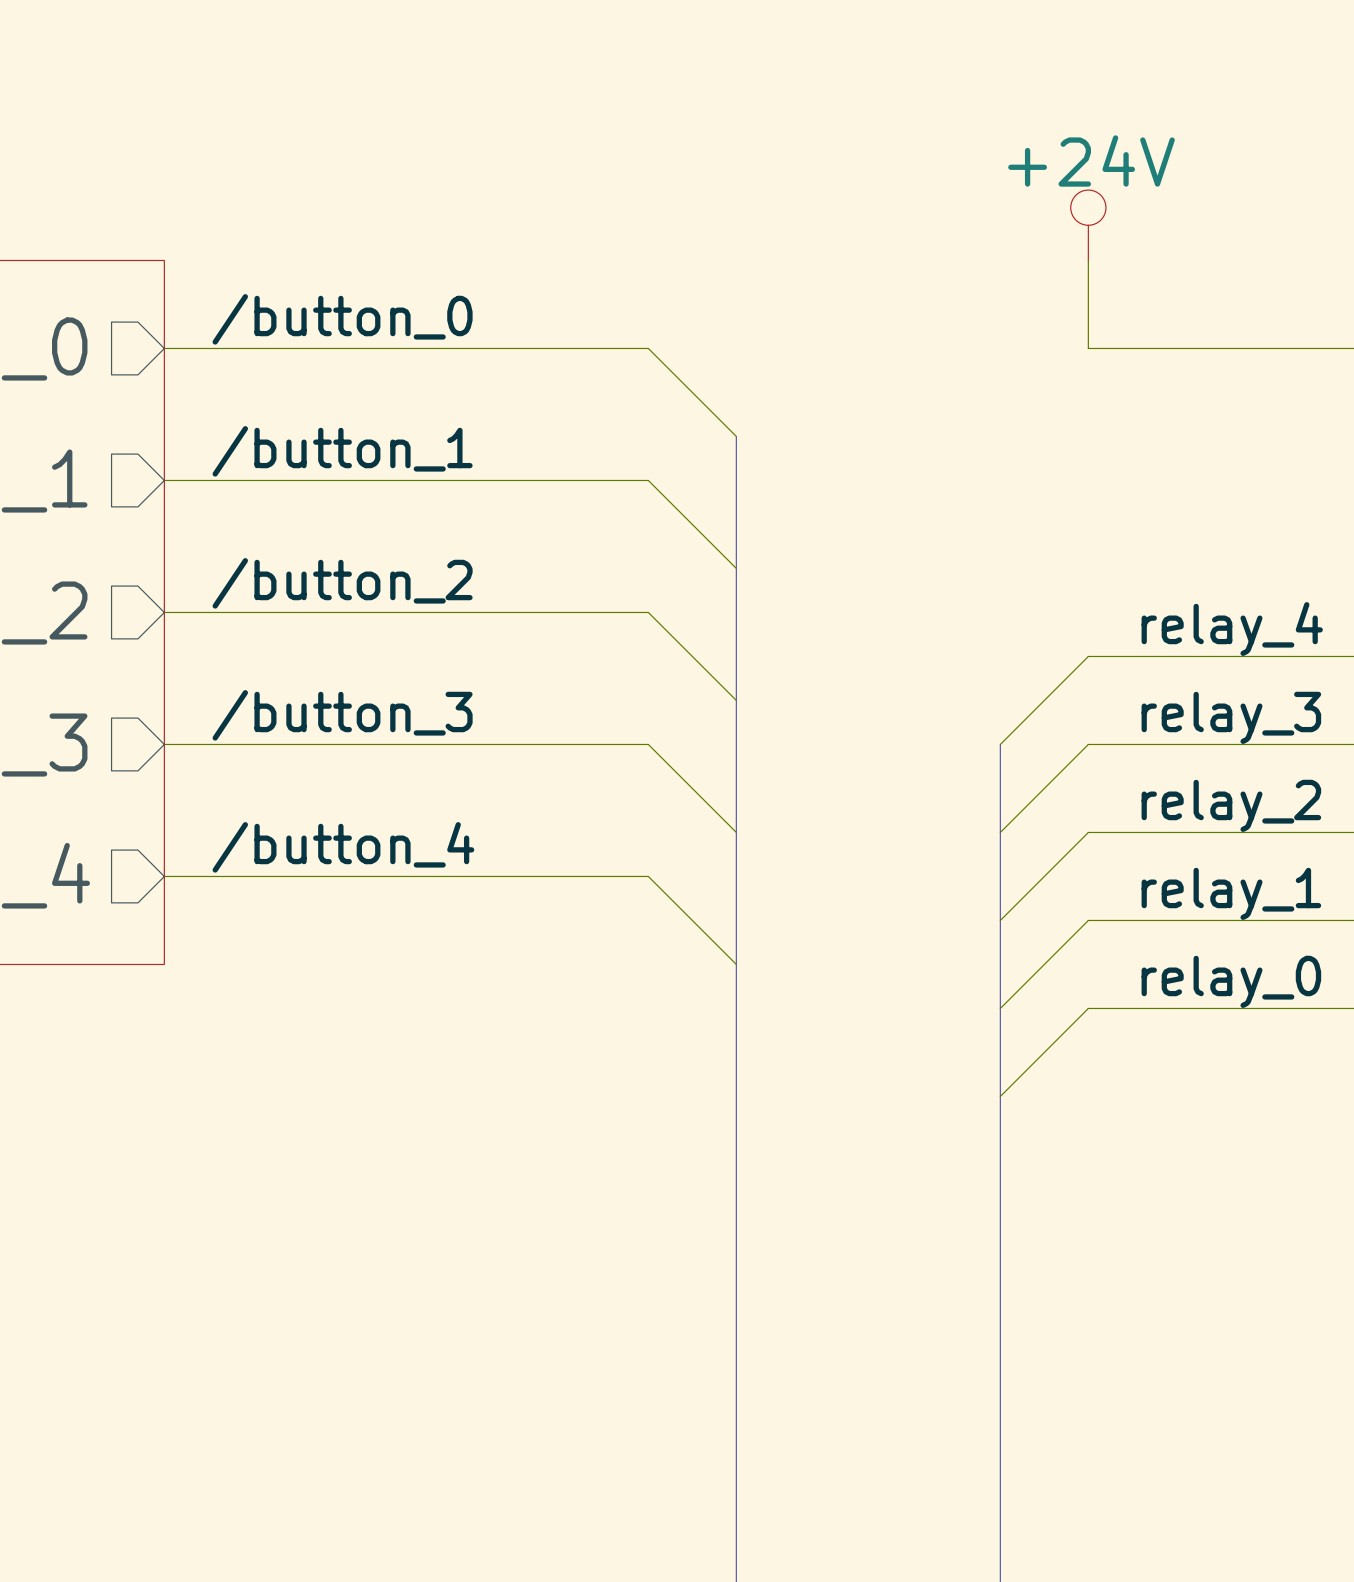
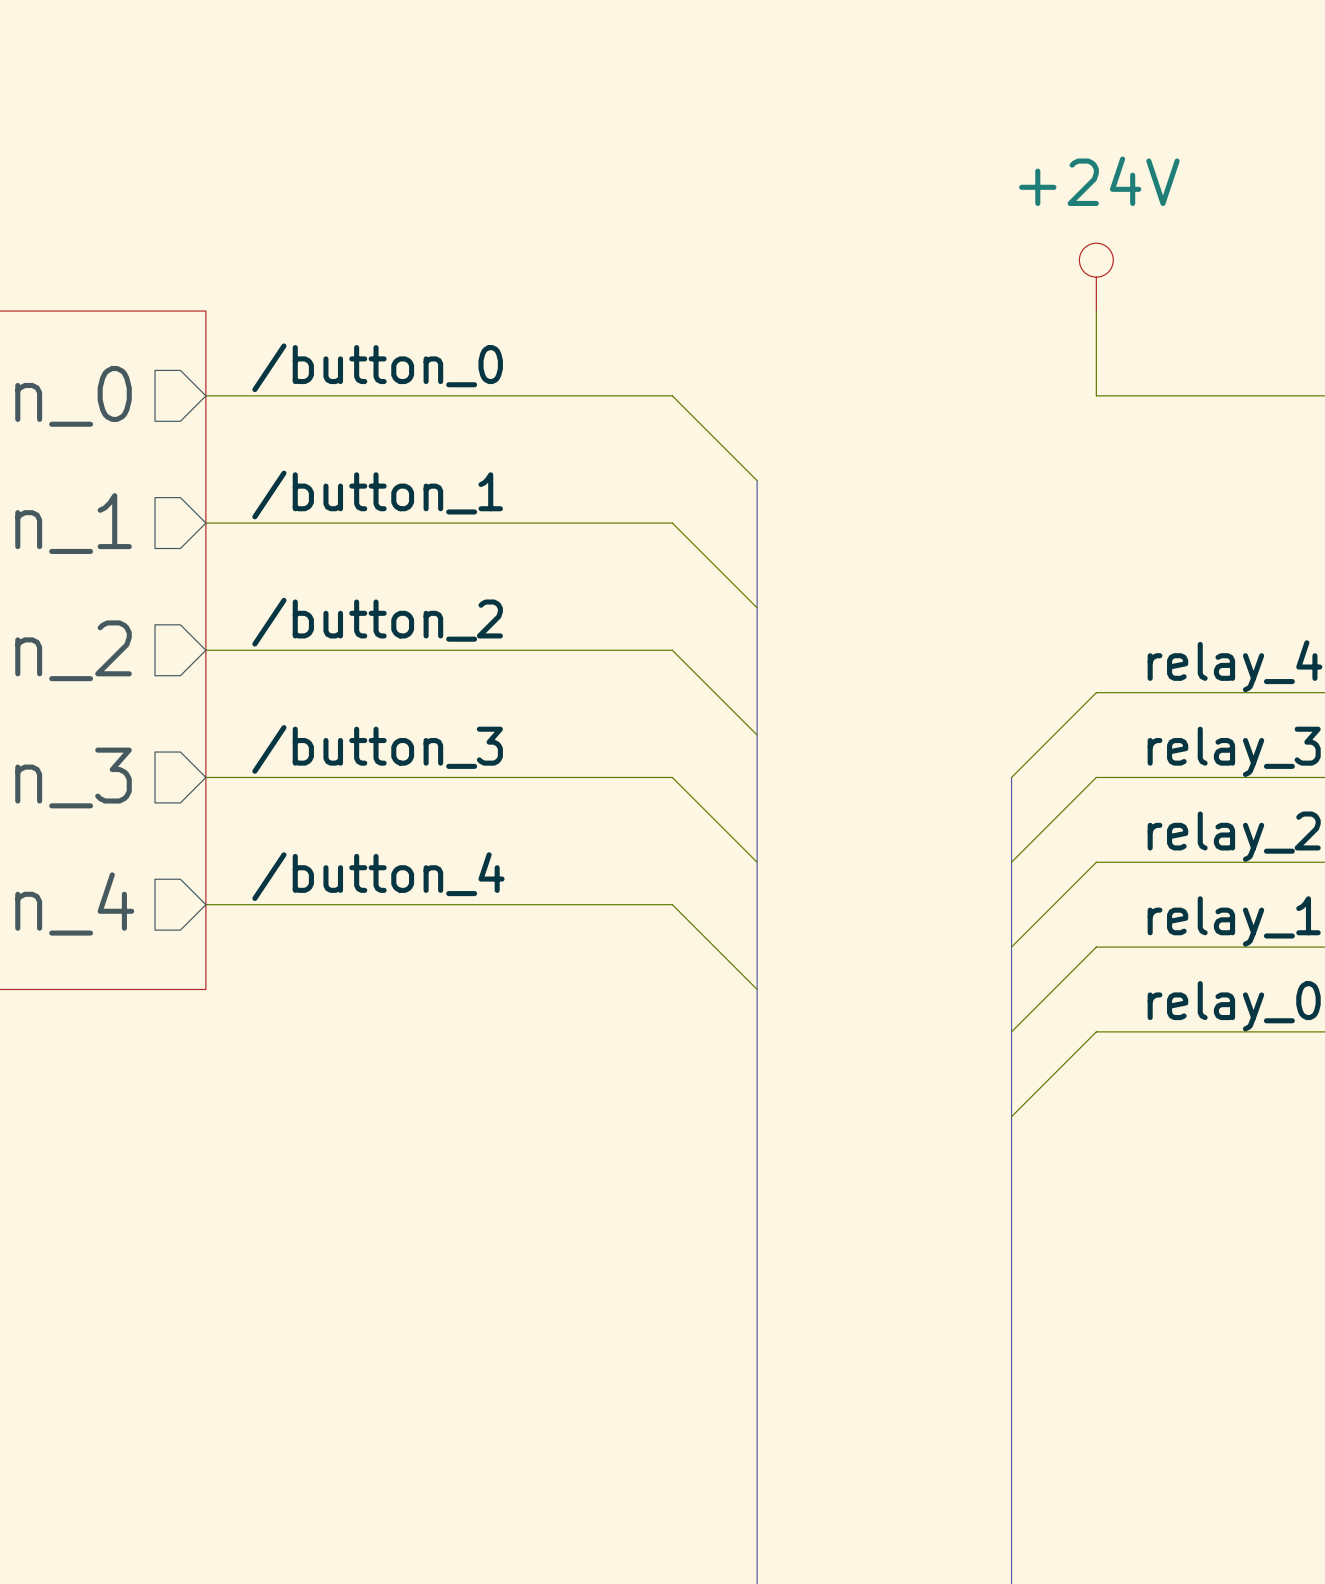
power symbol text position: +24V (1091, 160) -> +24V (1099, 181)

